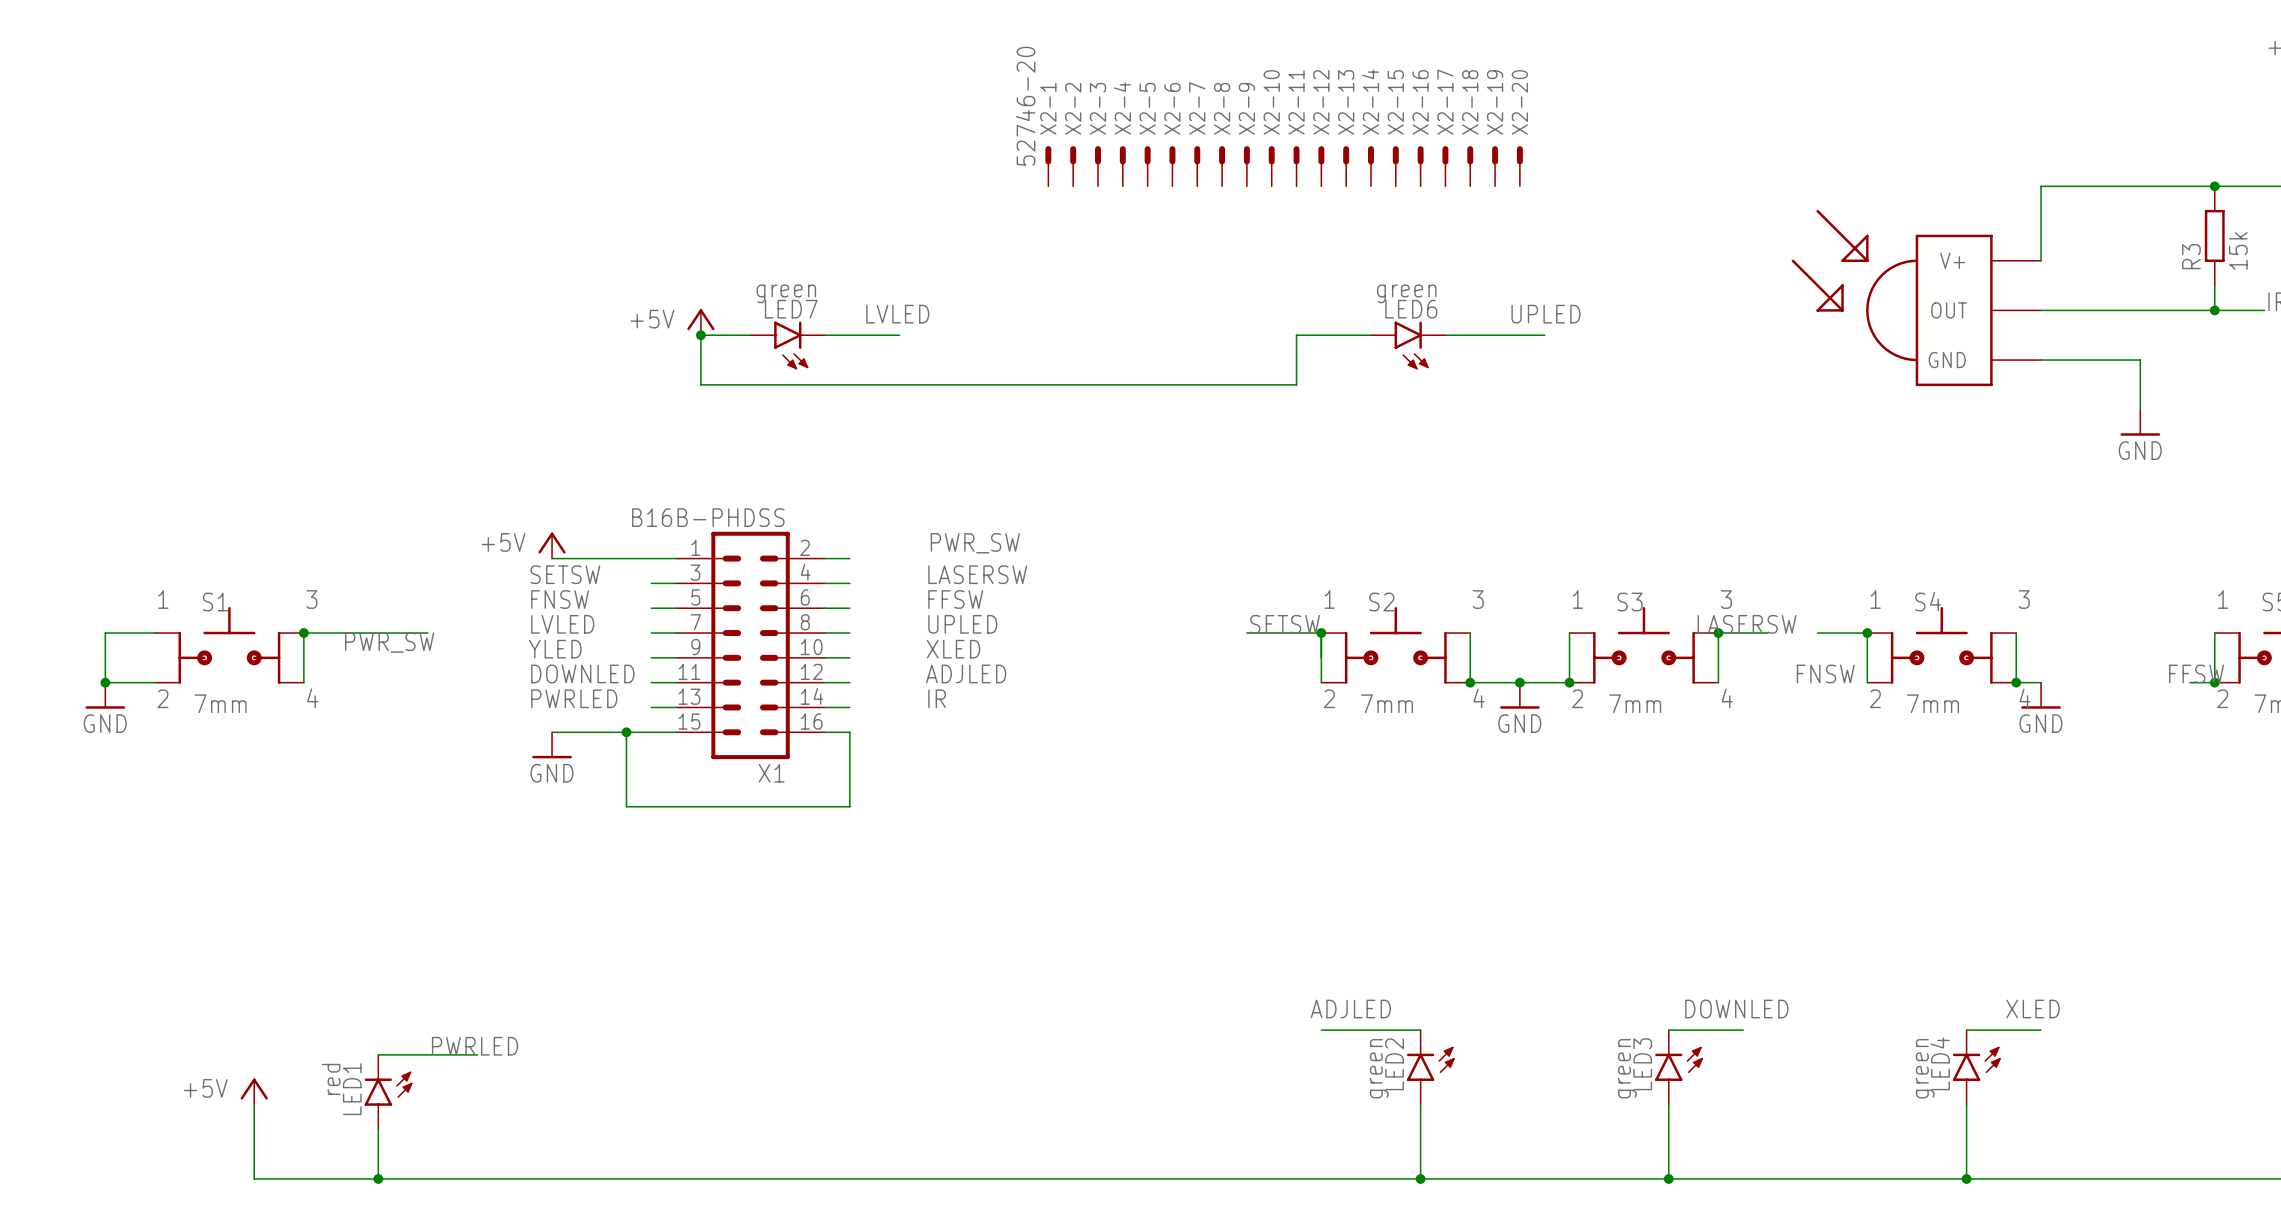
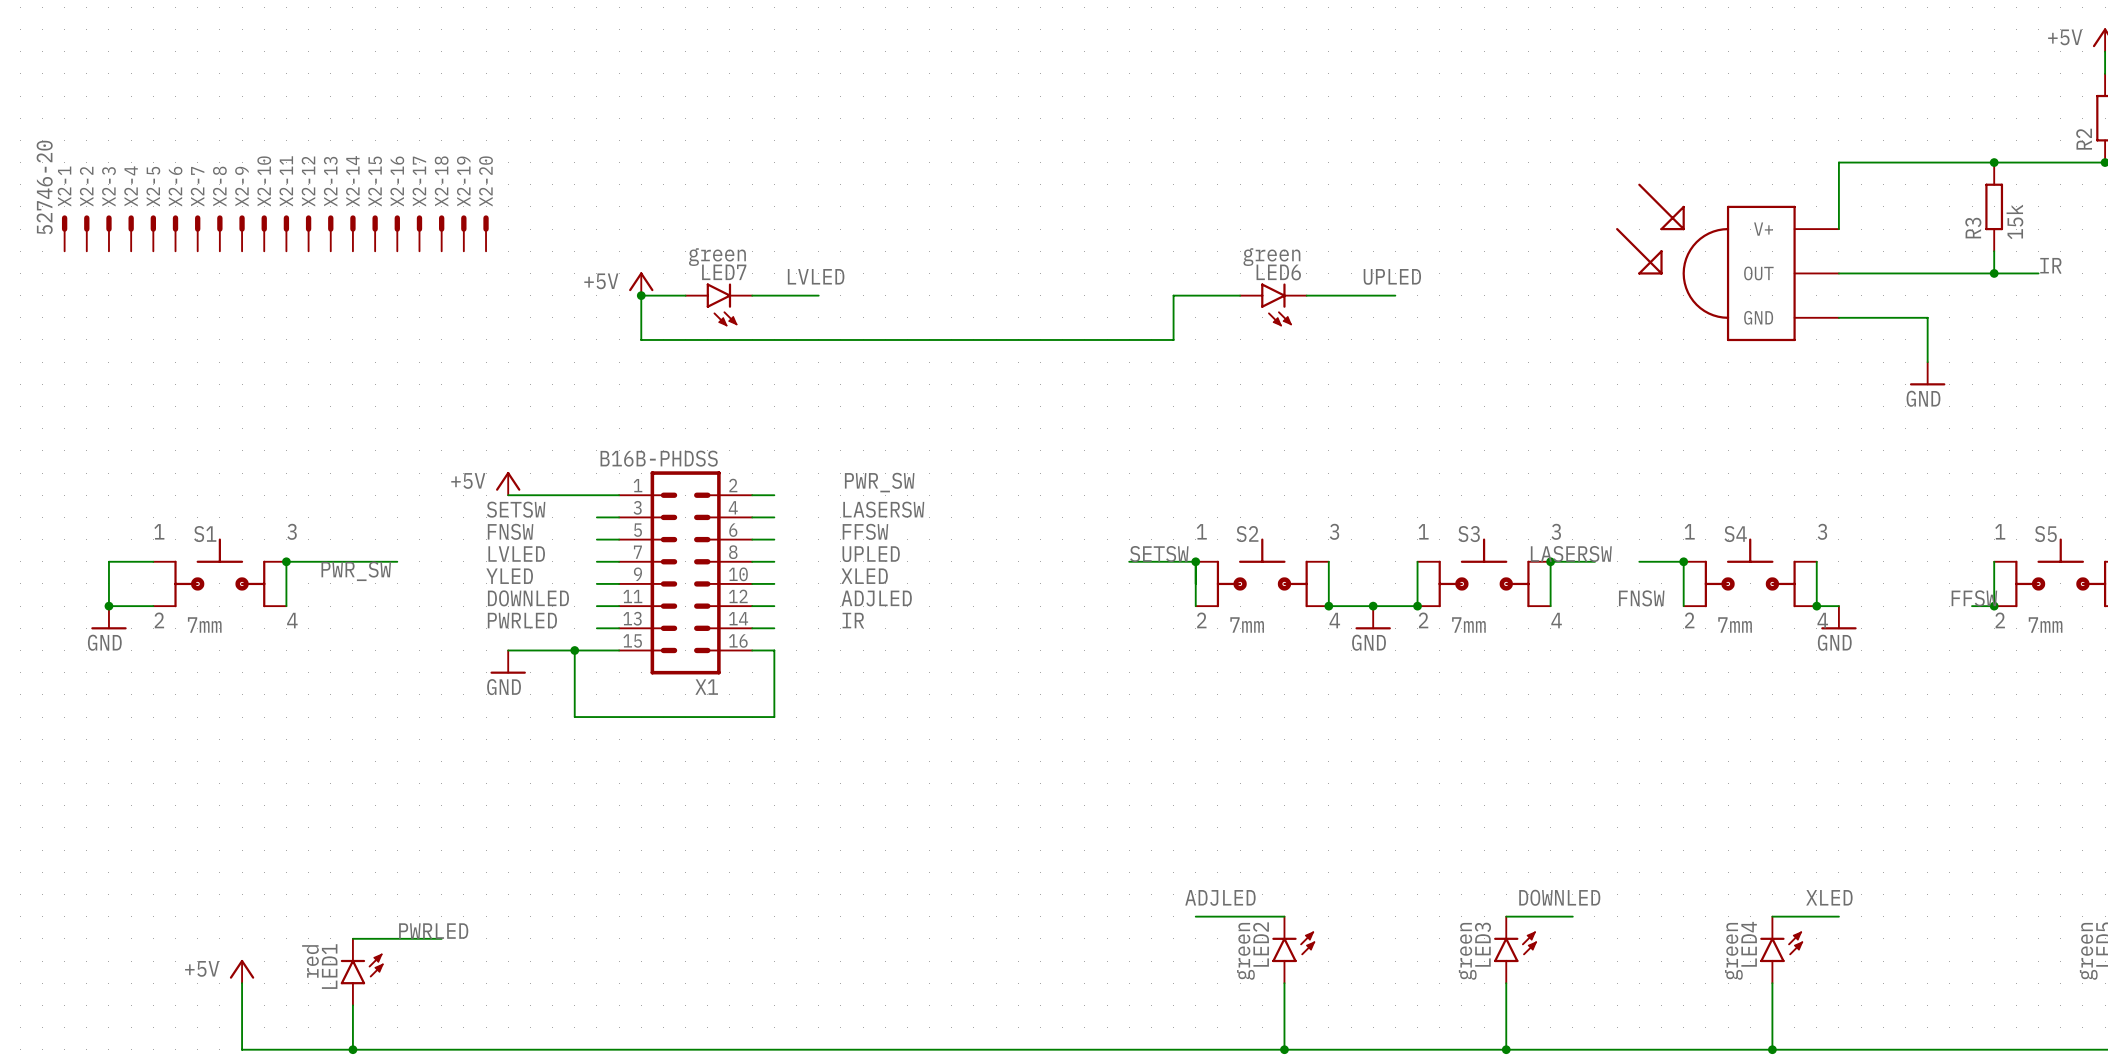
X2-1 position: (1048, 166) -> (64, 233)
X2-2 position: (1073, 166) -> (86, 233)
X2-3 position: (1098, 166) -> (108, 233)
X2-4 position: (1122, 166) -> (131, 233)
X2-5 position: (1147, 166) -> (153, 233)
X2-6 position: (1172, 166) -> (175, 233)
X2-7 position: (1197, 166) -> (197, 233)
X2-8 position: (1222, 166) -> (219, 233)
X2-9 position: (1246, 166) -> (242, 233)
X2-10 position: (1271, 166) -> (264, 233)
X2-11 position: (1296, 166) -> (286, 233)
X2-12 position: (1321, 166) -> (308, 233)
X2-13 position: (1346, 166) -> (330, 233)
X2-14 position: (1370, 166) -> (352, 233)
X2-15 position: (1395, 166) -> (375, 233)
X2-16 position: (1420, 166) -> (397, 233)
X2-17 position: (1445, 166) -> (419, 233)
X2-18 position: (1470, 166) -> (441, 233)
X2-19 position: (1495, 166) -> (463, 233)
X2-20 position: (1519, 166) -> (486, 233)

